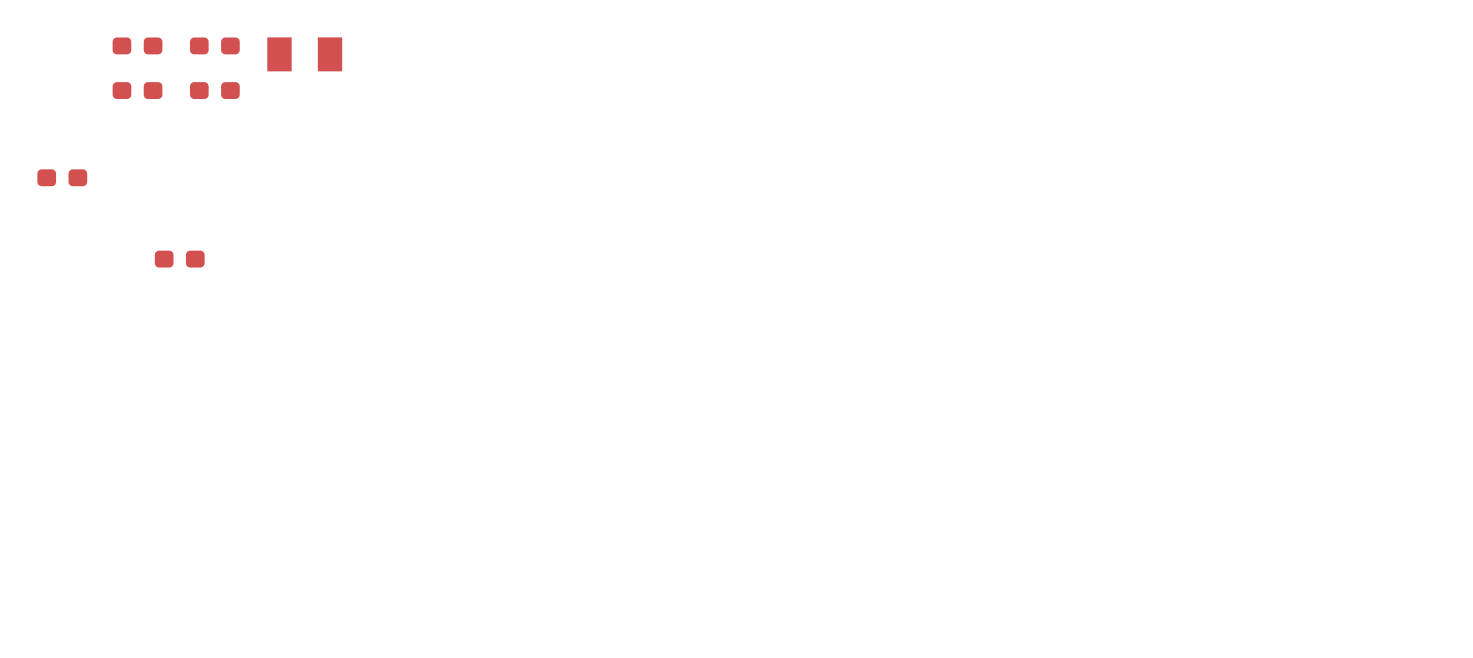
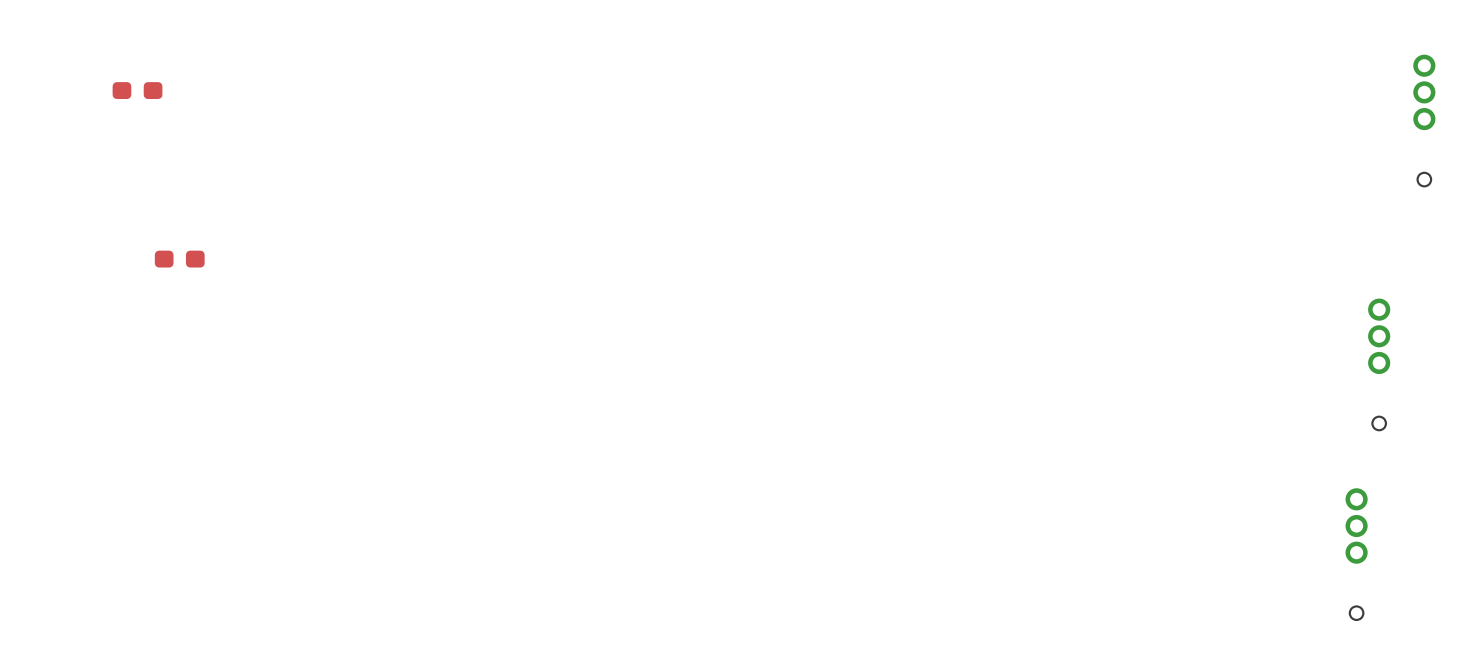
part: (137, 45) -> none
part: (214, 45) -> none
part: (304, 54) -> none
part: (214, 90) -> none
part: none -> (1424, 121)
part: (62, 177) -> none
part: none -> (1379, 364)
part: none -> (1356, 554)

